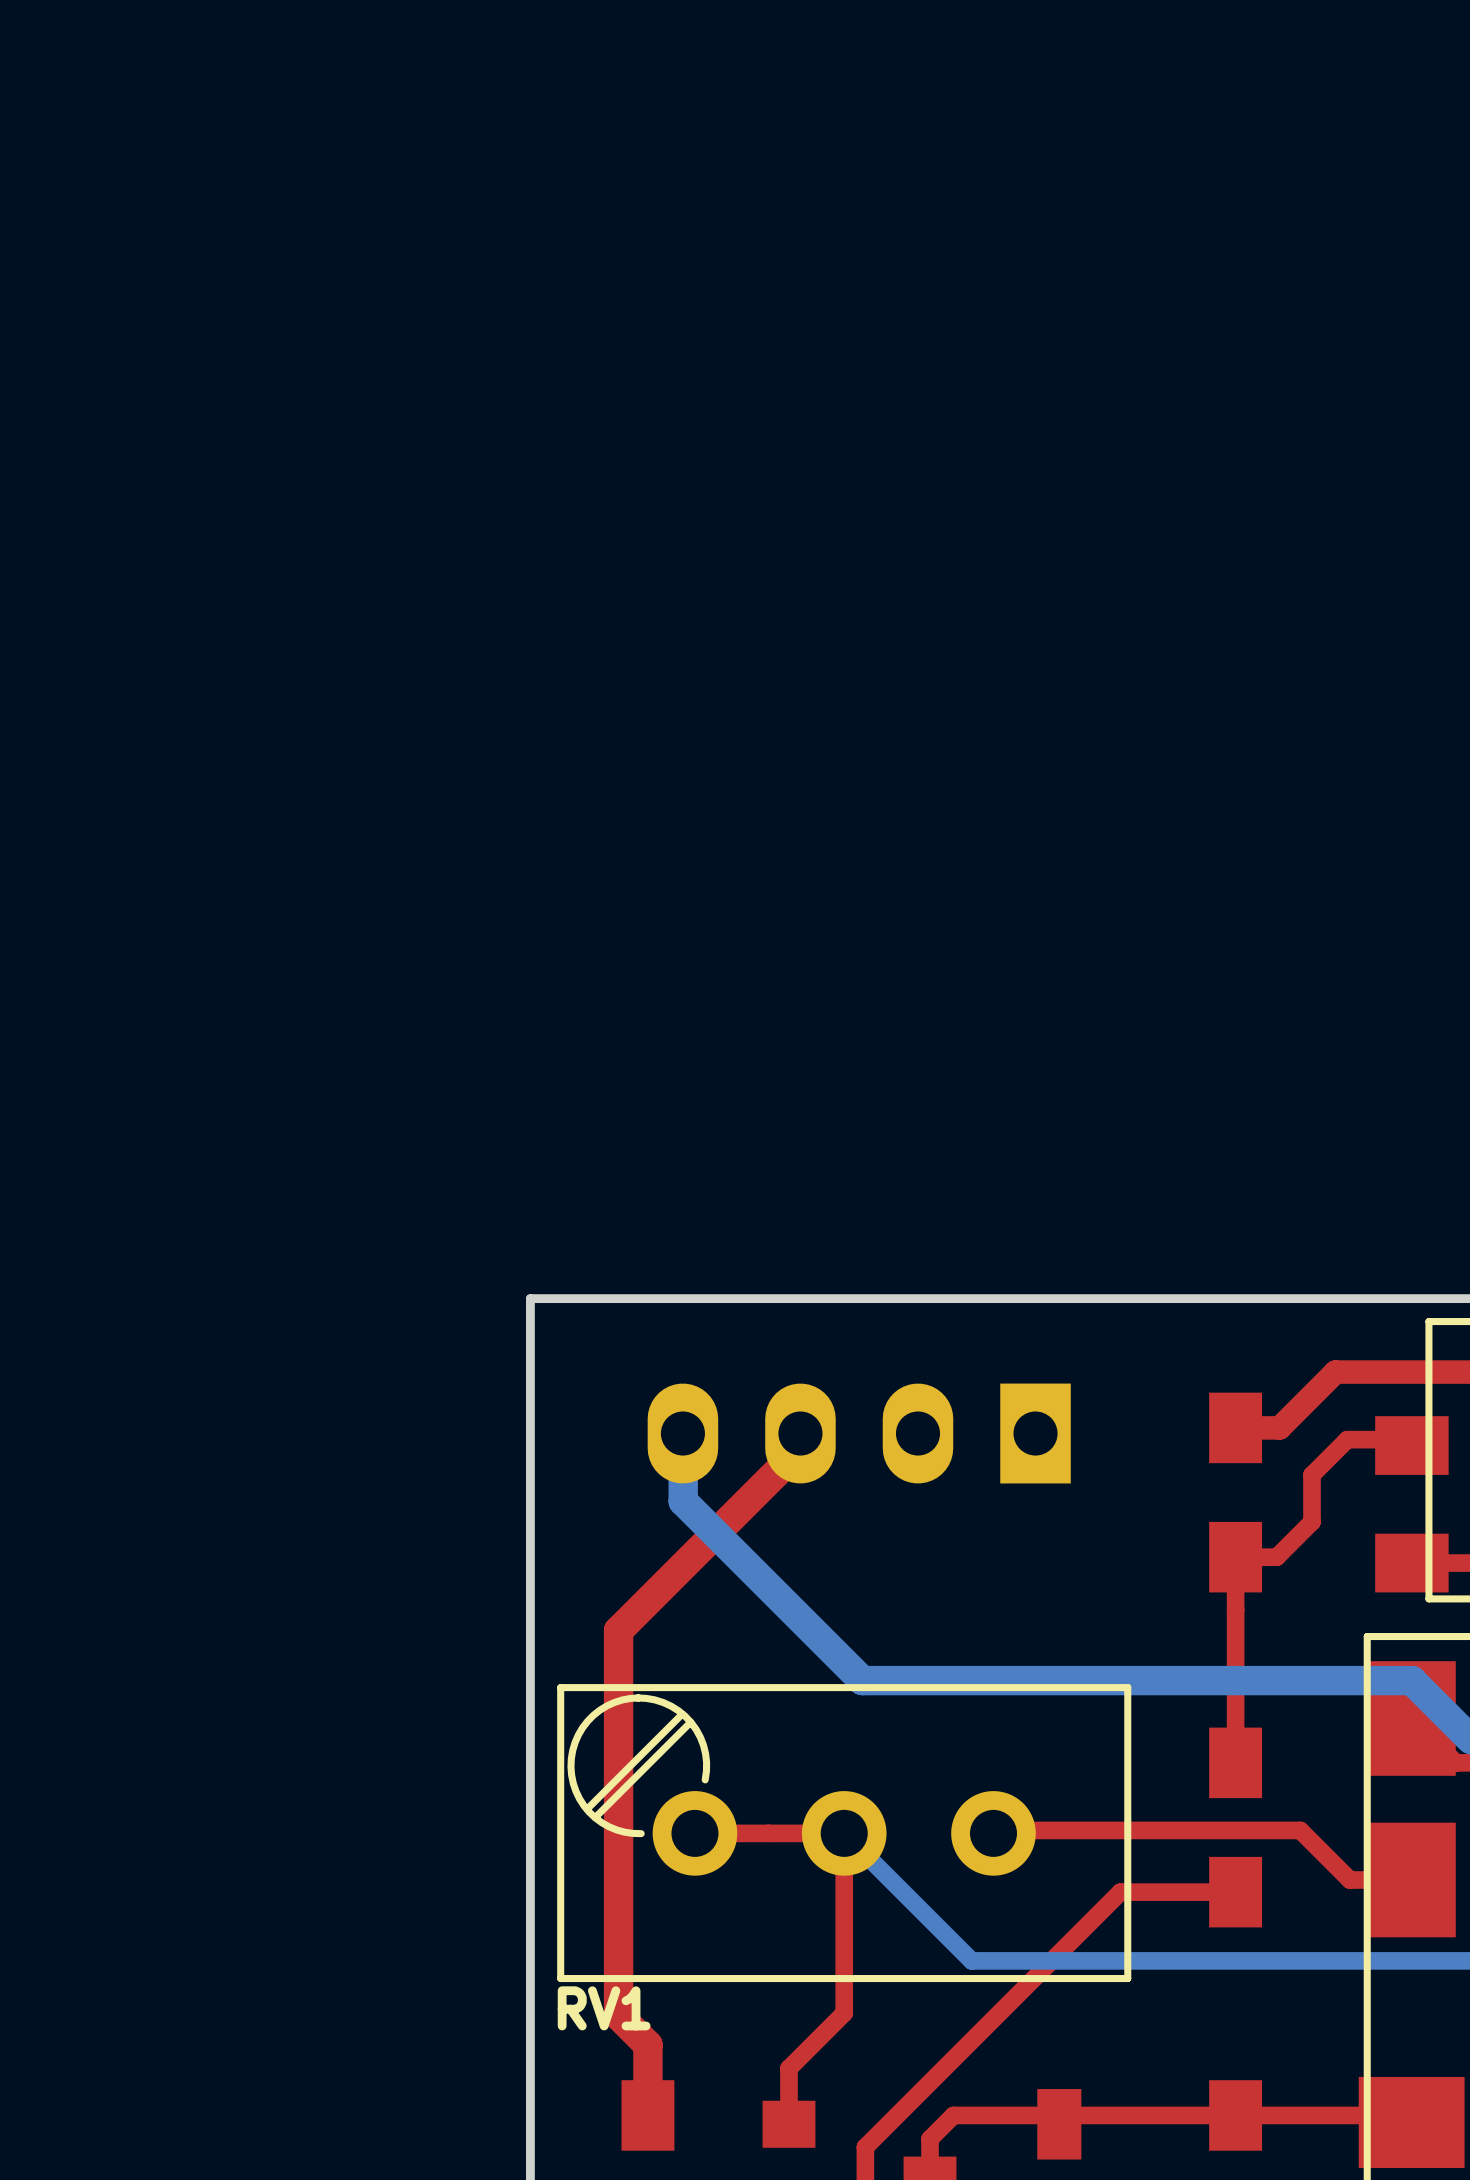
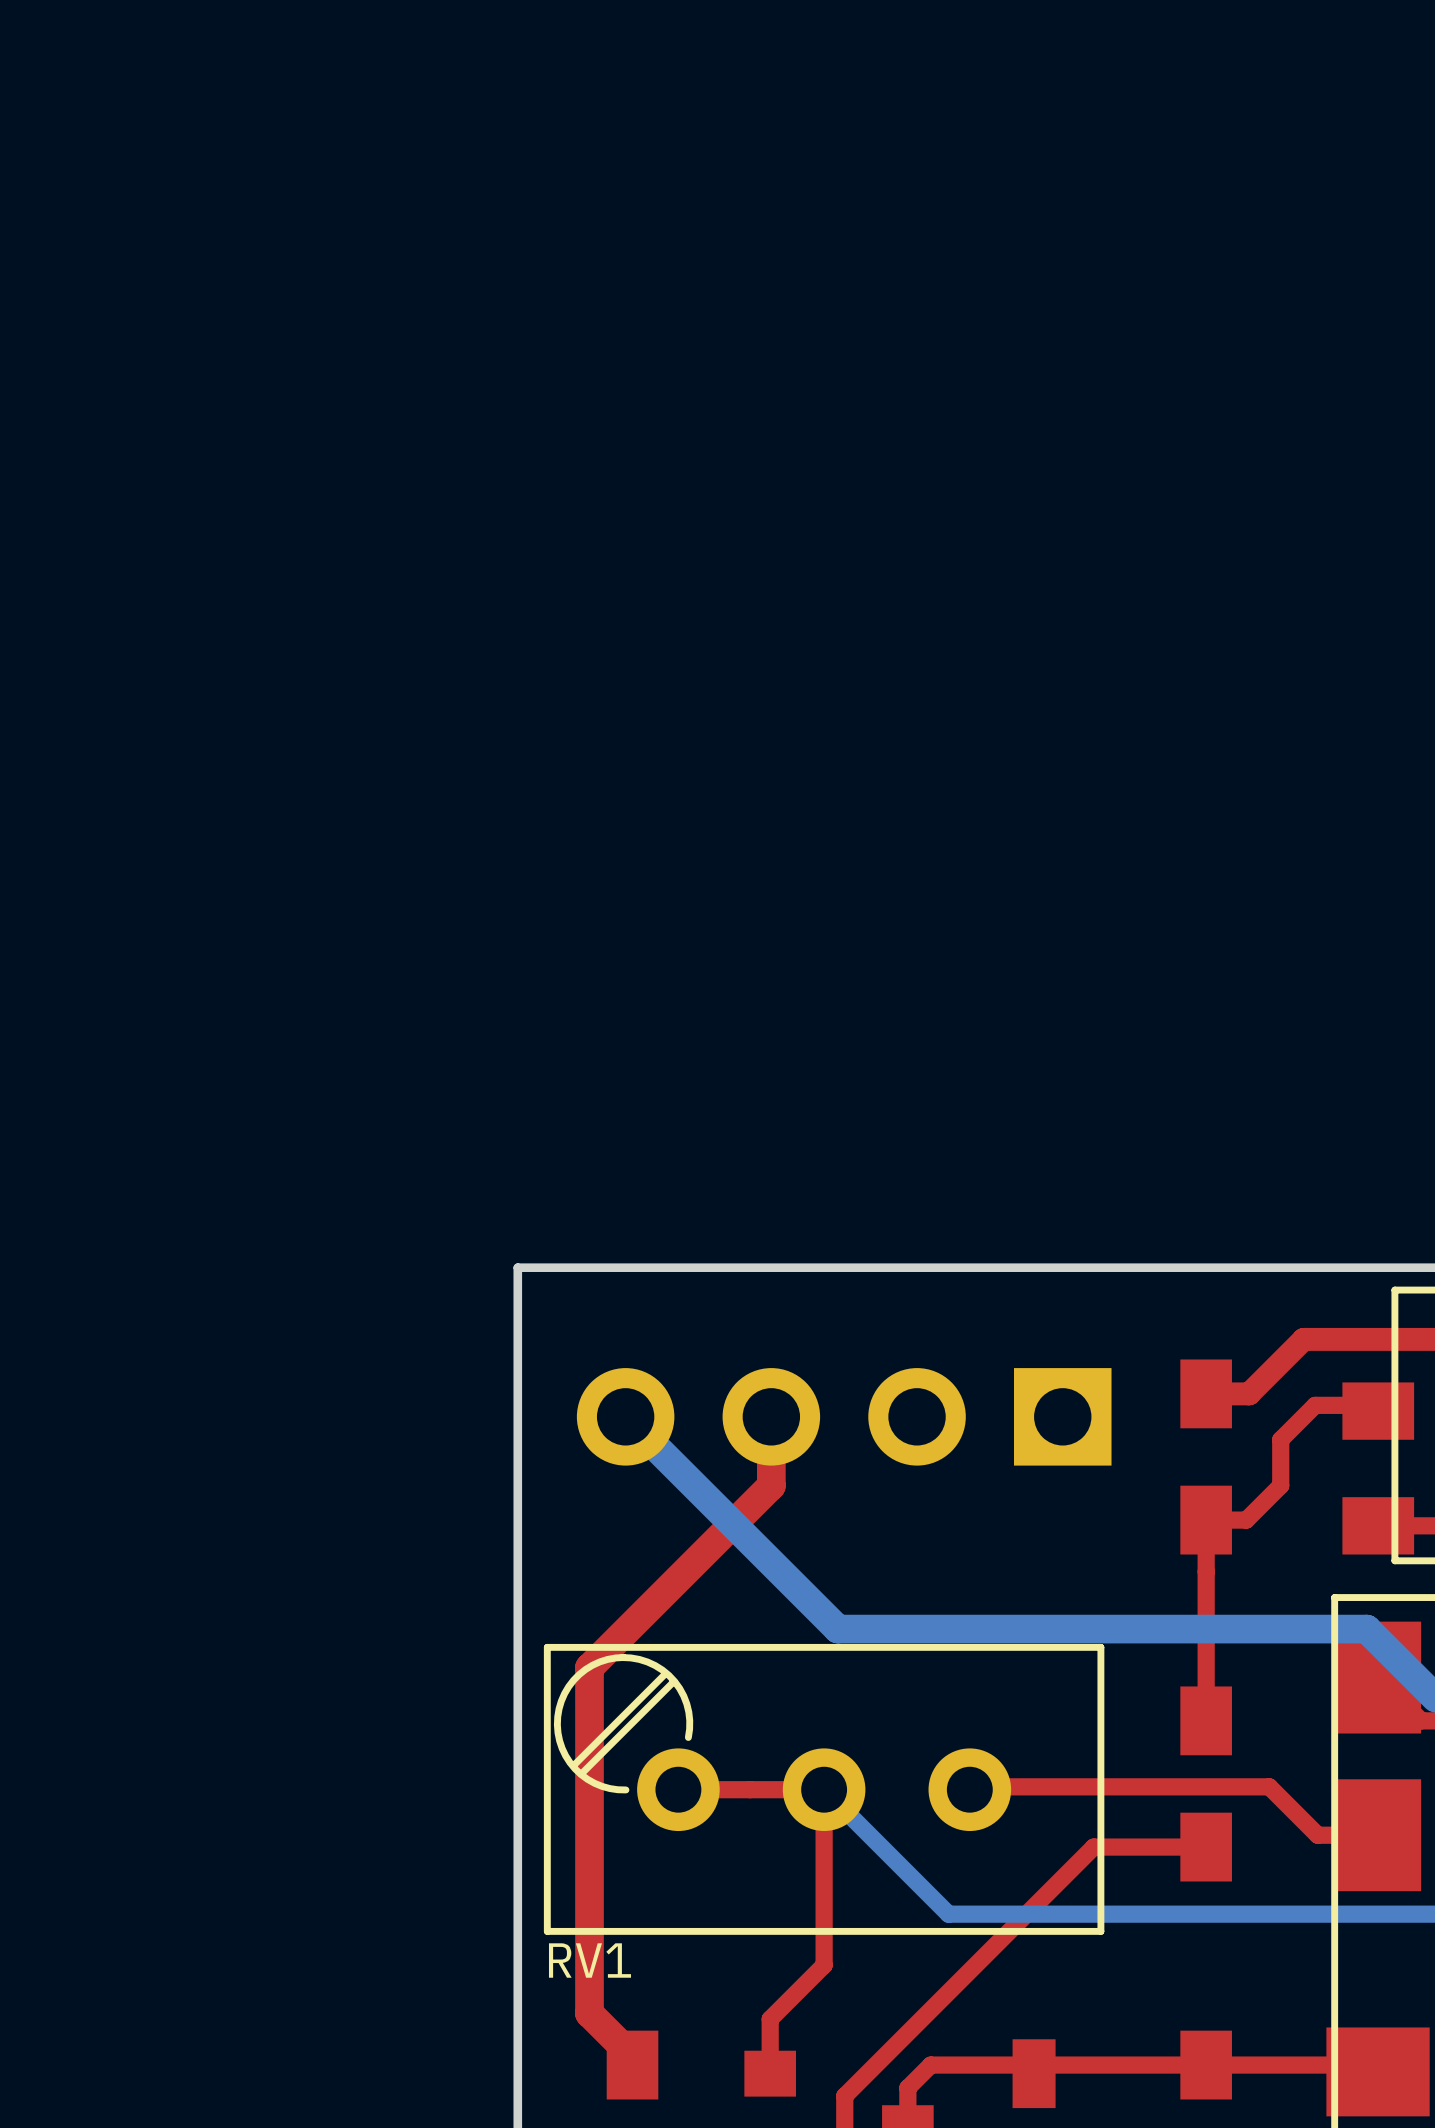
part footprint: [647, 1383, 1071, 1484] -> [576, 1368, 1112, 1466]
bottom track: (683, 1433) (683, 1501) (862, 1680) (1411, 1680) -> (625, 1416) (837, 1629) (1366, 1629) (1378, 1640)
top track: (800, 1448) (618, 1630) (618, 2015) (647, 2044) (647, 2106) -> (771, 1416) (771, 1485) (589, 1667) (589, 2013) (632, 2056)

